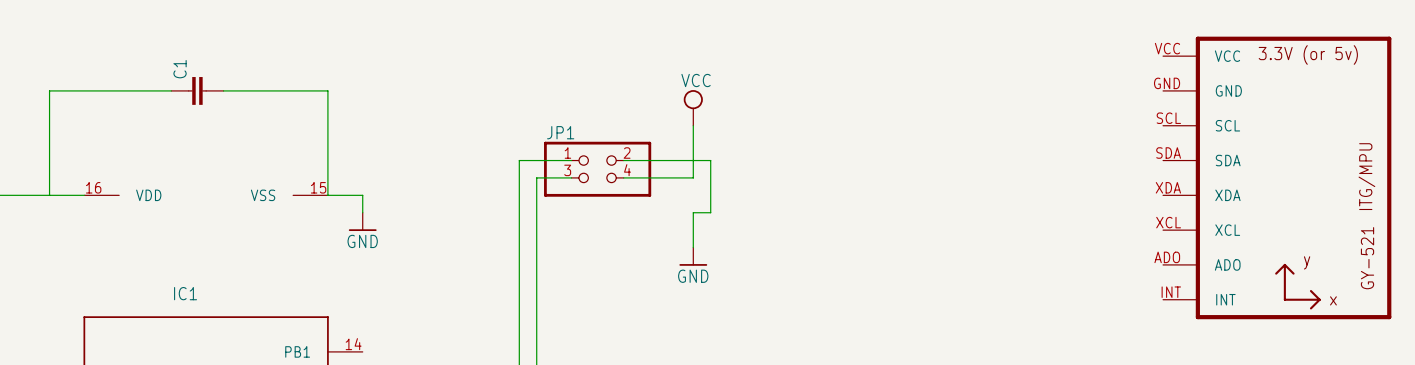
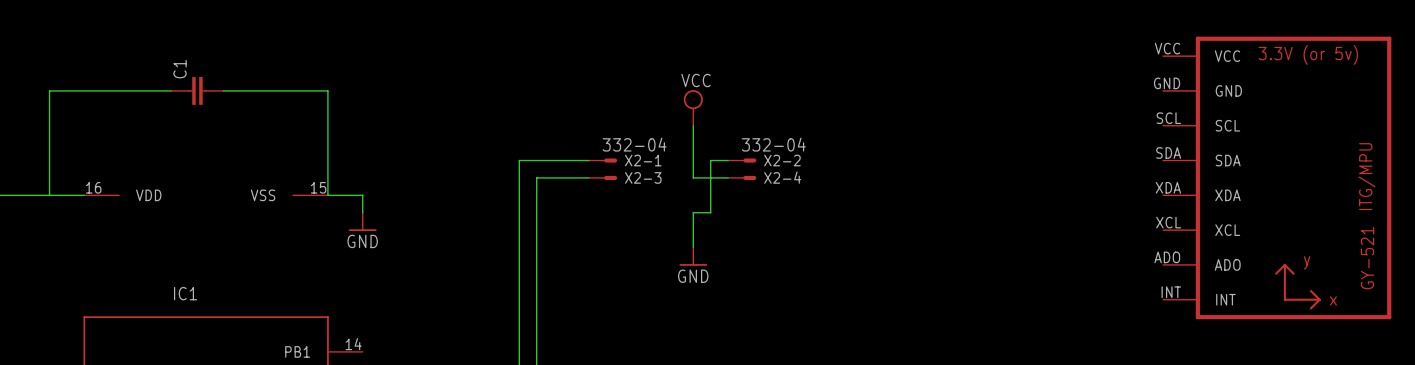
X2-1: none -> 332-04 (603, 160)
wire: (623, 160) (710, 160) -> (728, 160) (710, 160)
X2-2: none -> 332-04 (742, 160)
JP1: (597, 169) -> none
X2-3: none -> (603, 177)
wire: (623, 177) (693, 177) -> (728, 177) (693, 177)
X2-4: none -> (742, 177)

